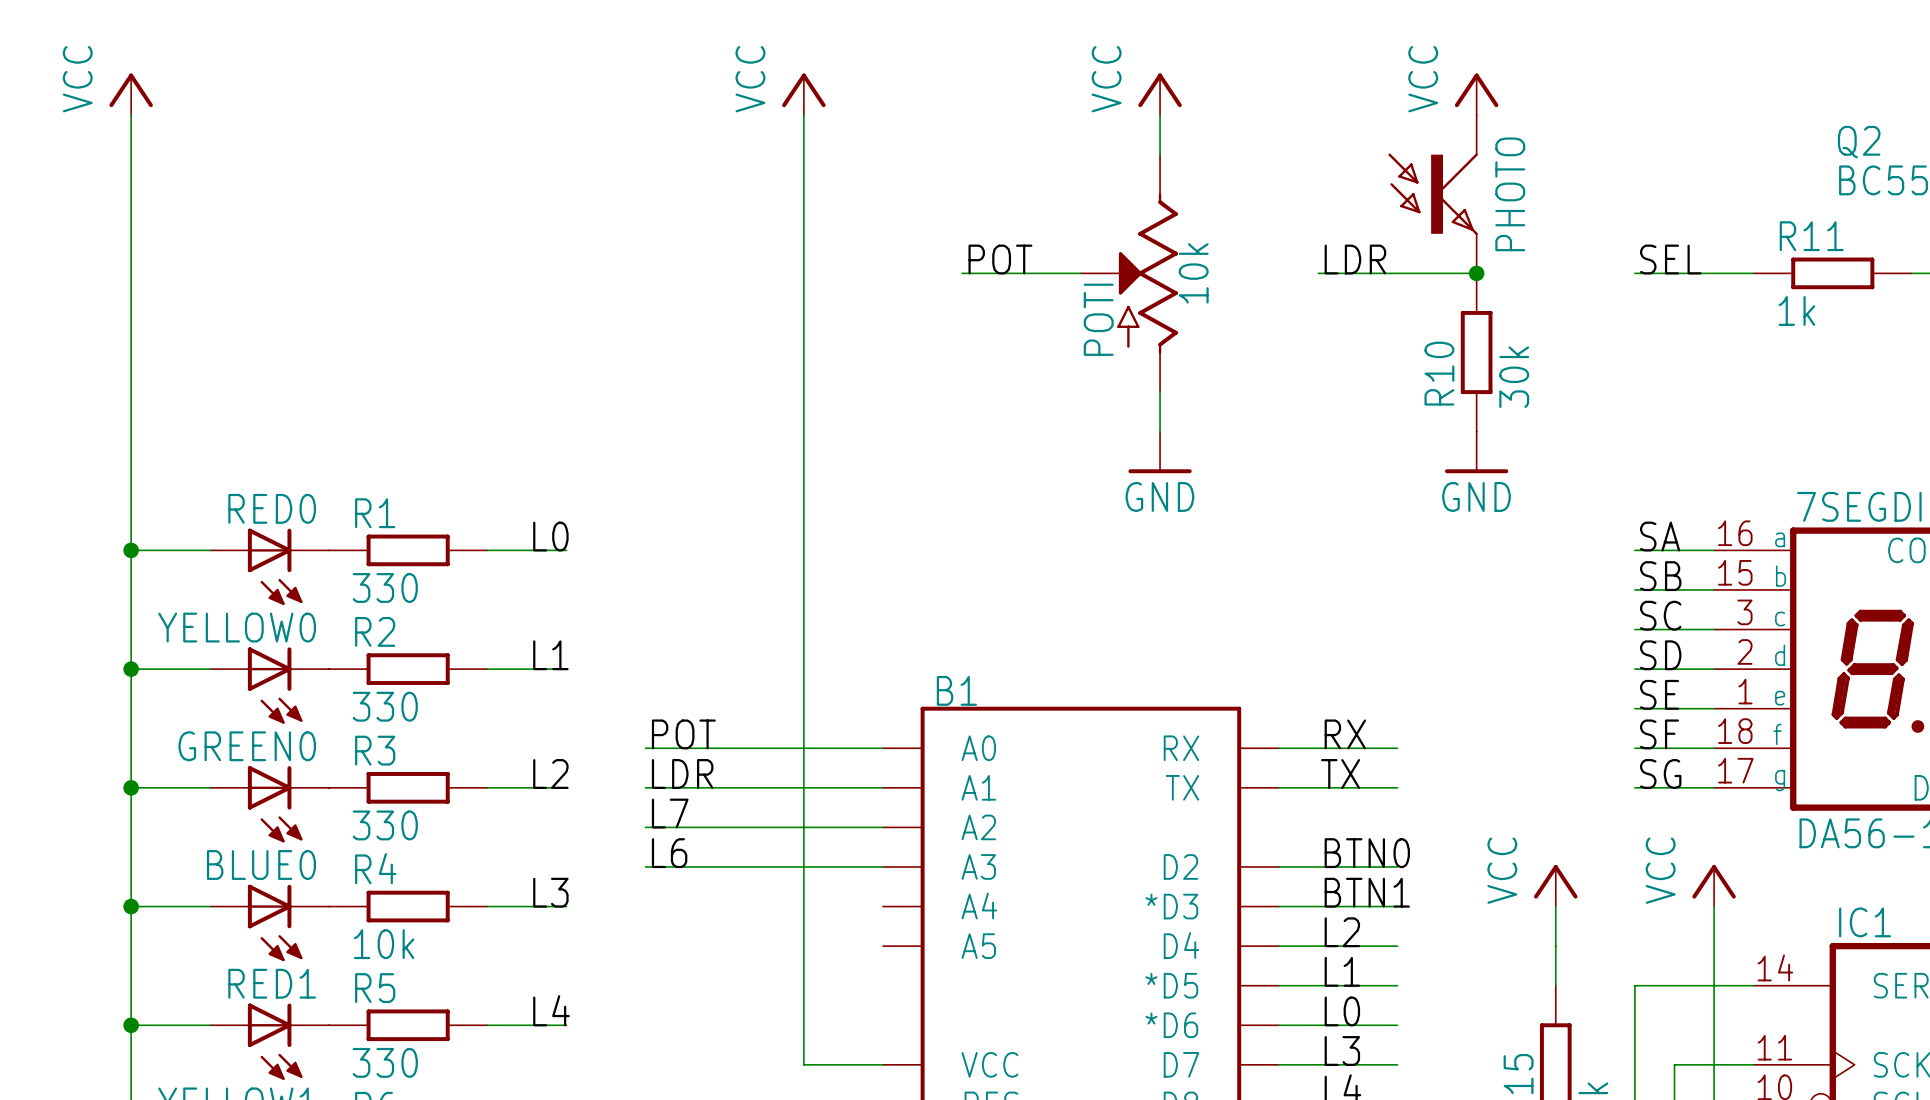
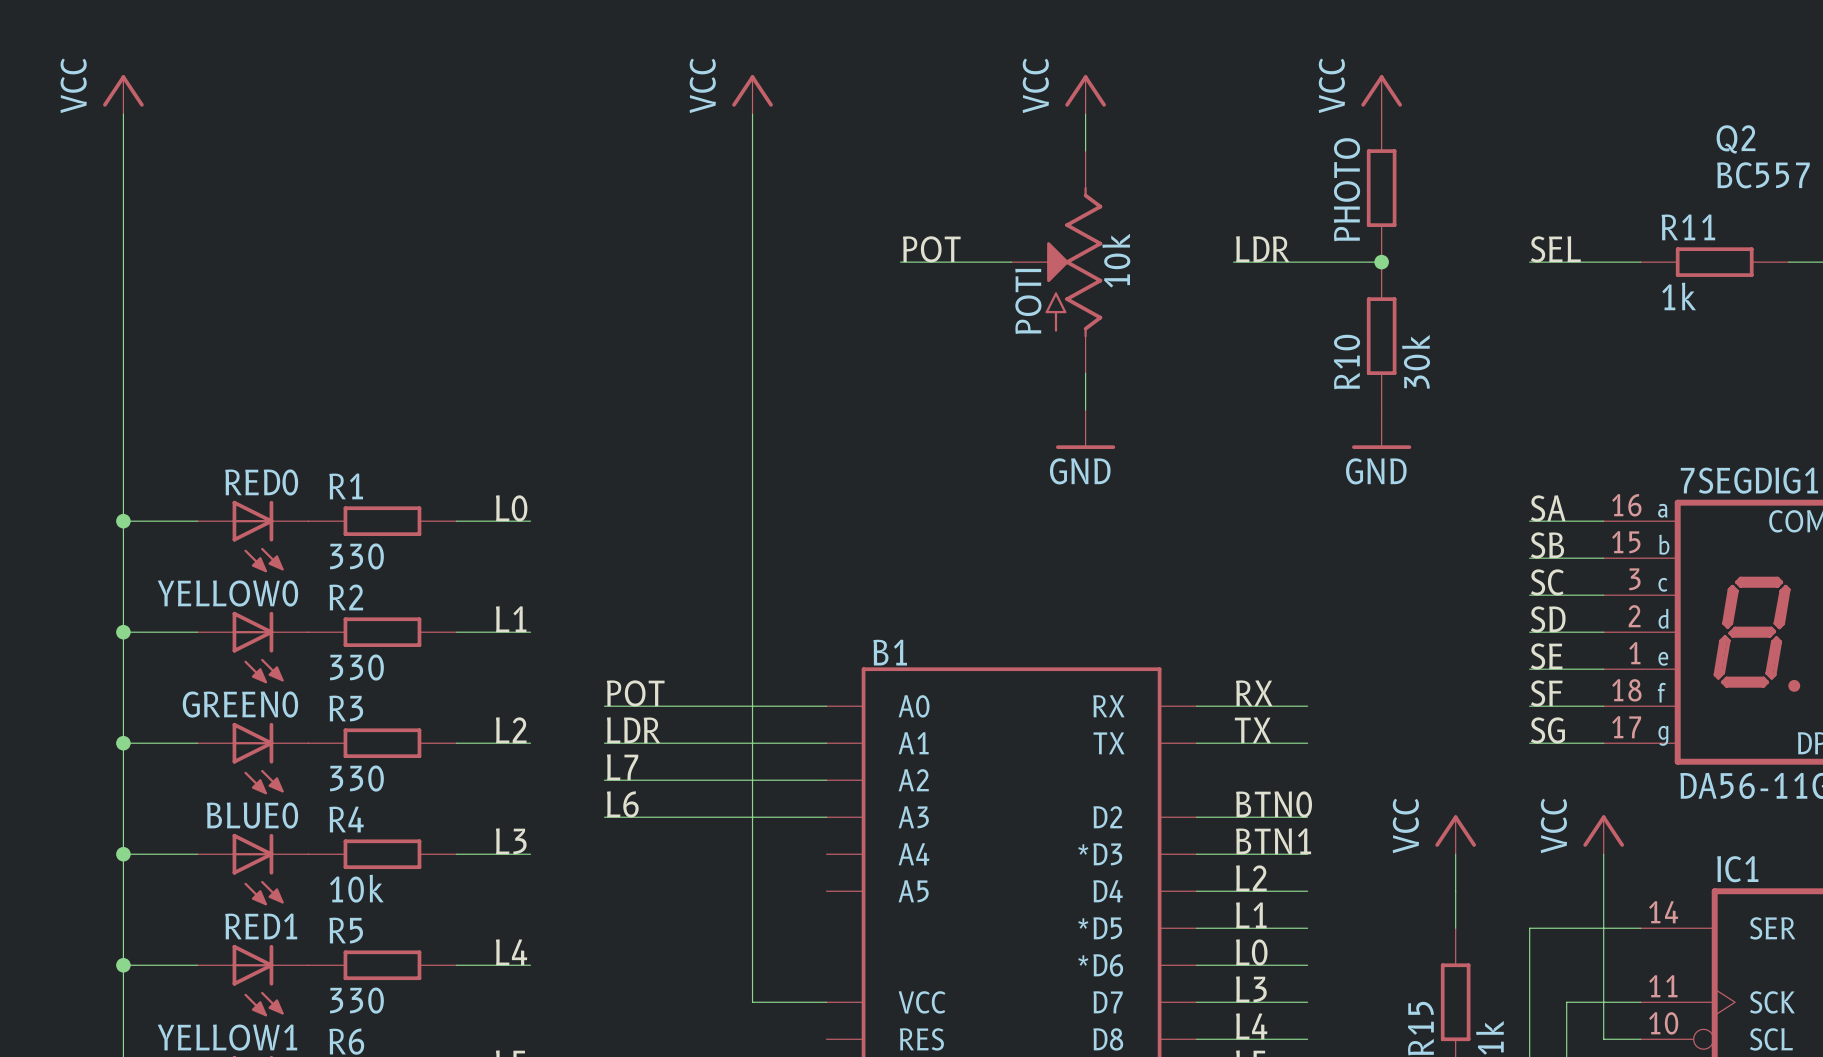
PHOTO: (1433, 194) -> none
PHOTO: none -> (1381, 188)

